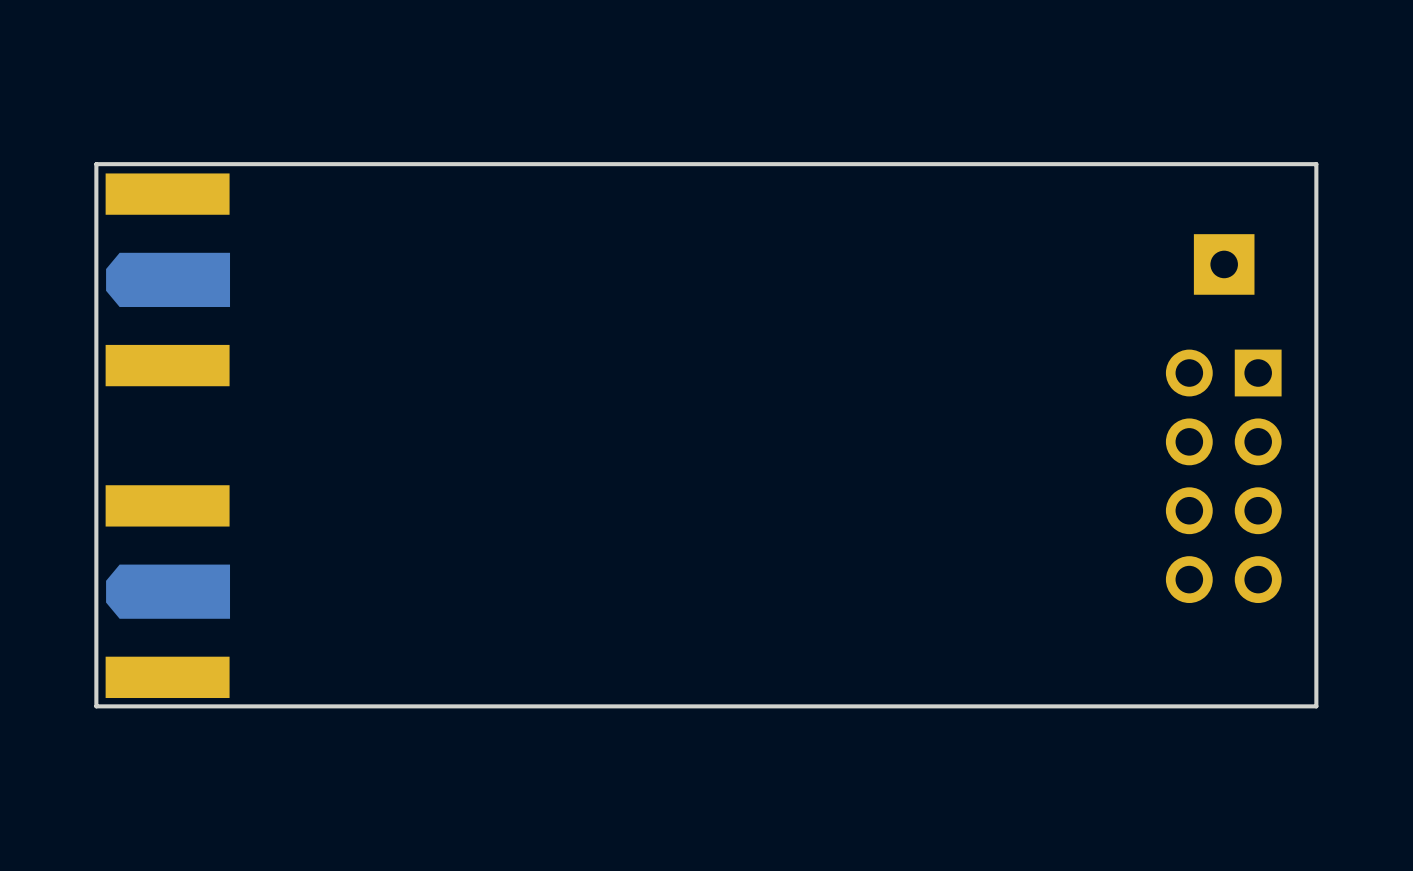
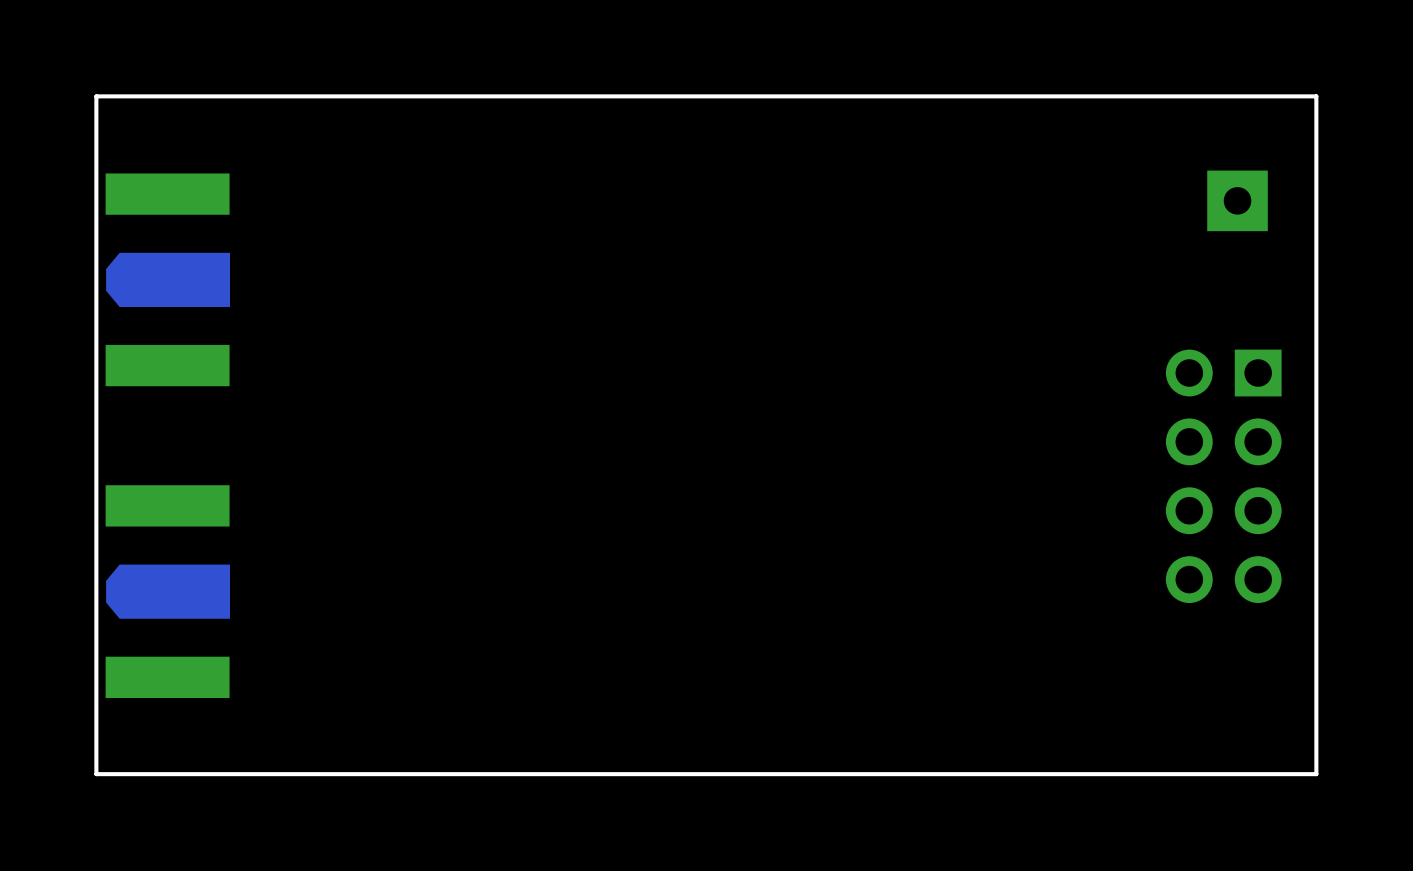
board edge: (1316, 164) (96, 164) -> (1316, 164) (1316, 96) (96, 96) (96, 164)
part position: (1224, 264) -> (1237, 200)
board edge: (1316, 706) (96, 706) -> (1316, 706) (1316, 774) (96, 774) (96, 706)

